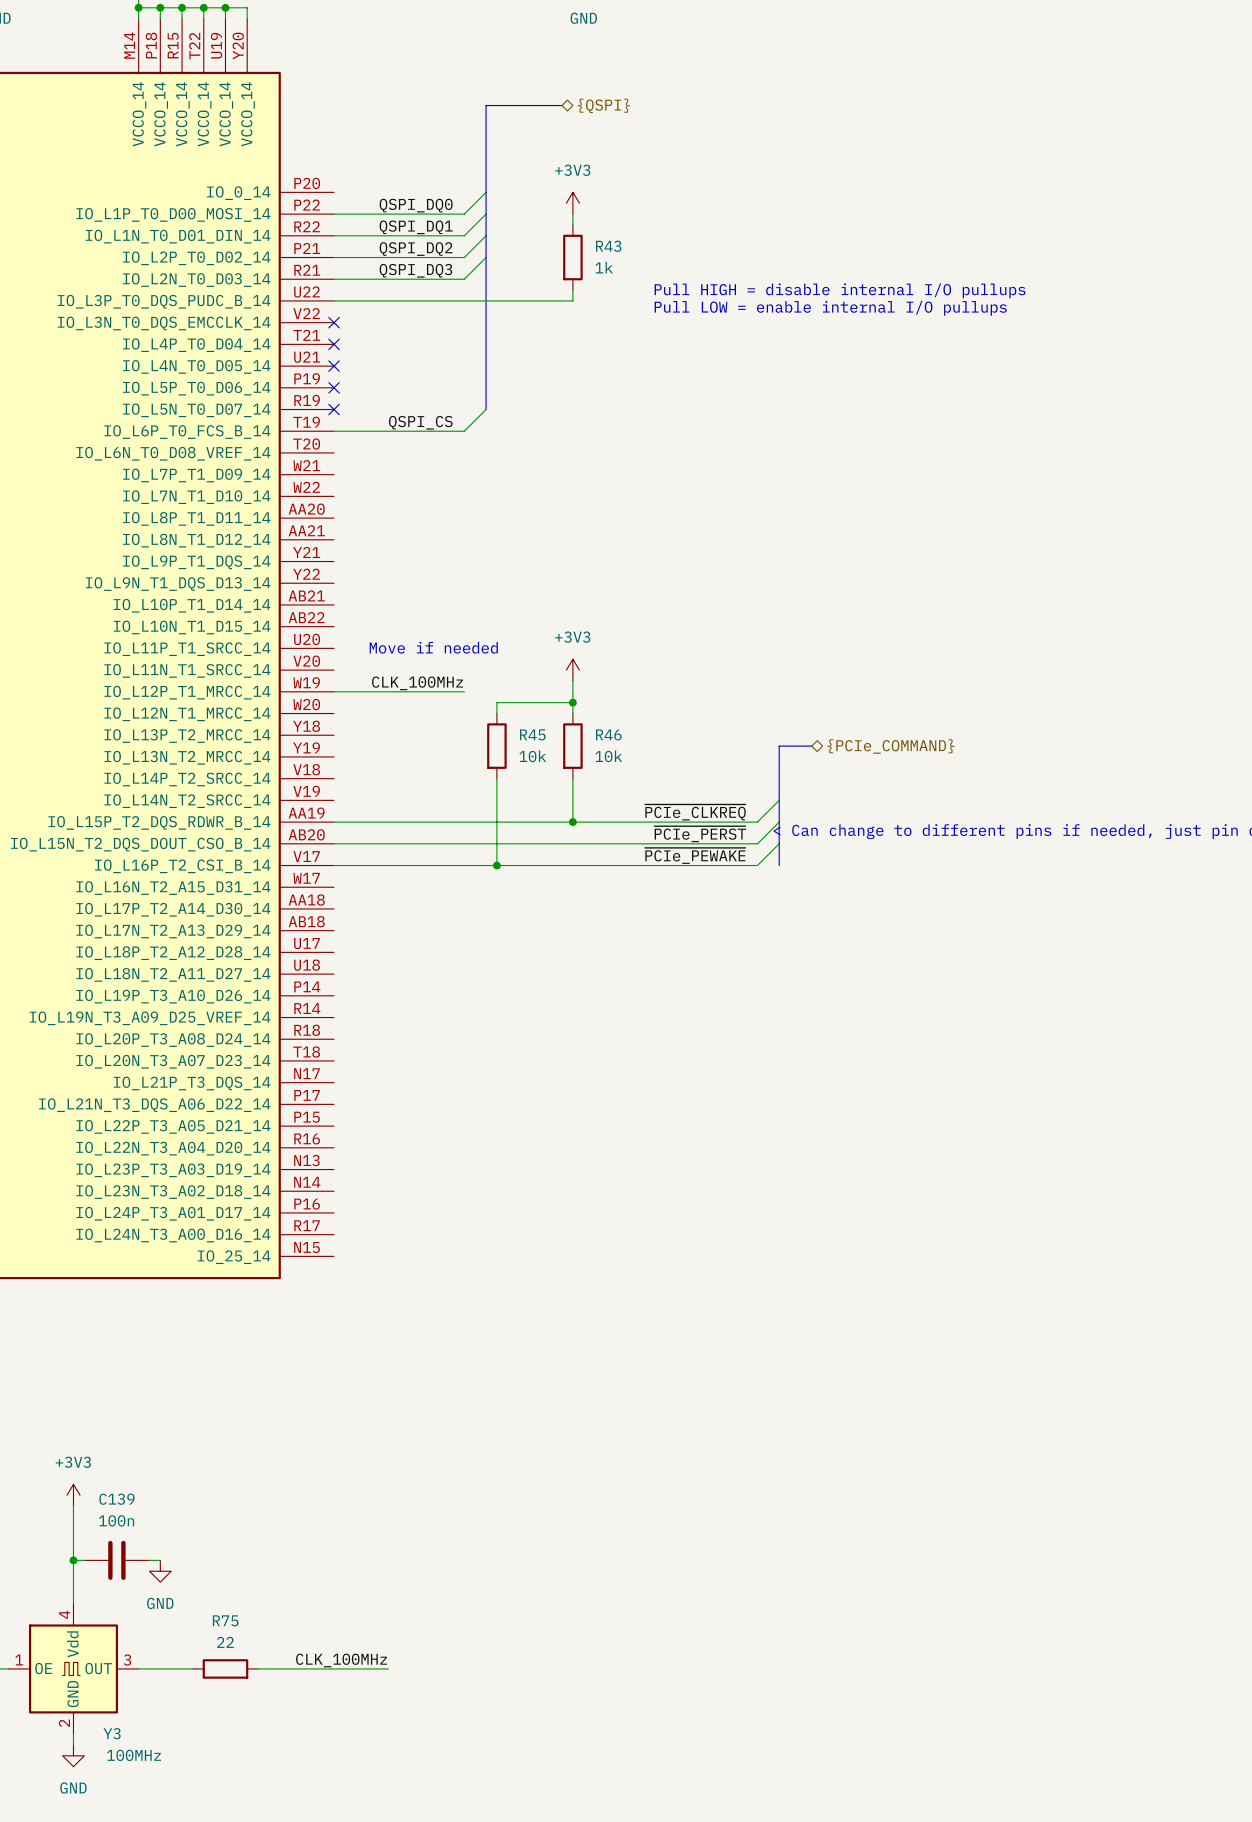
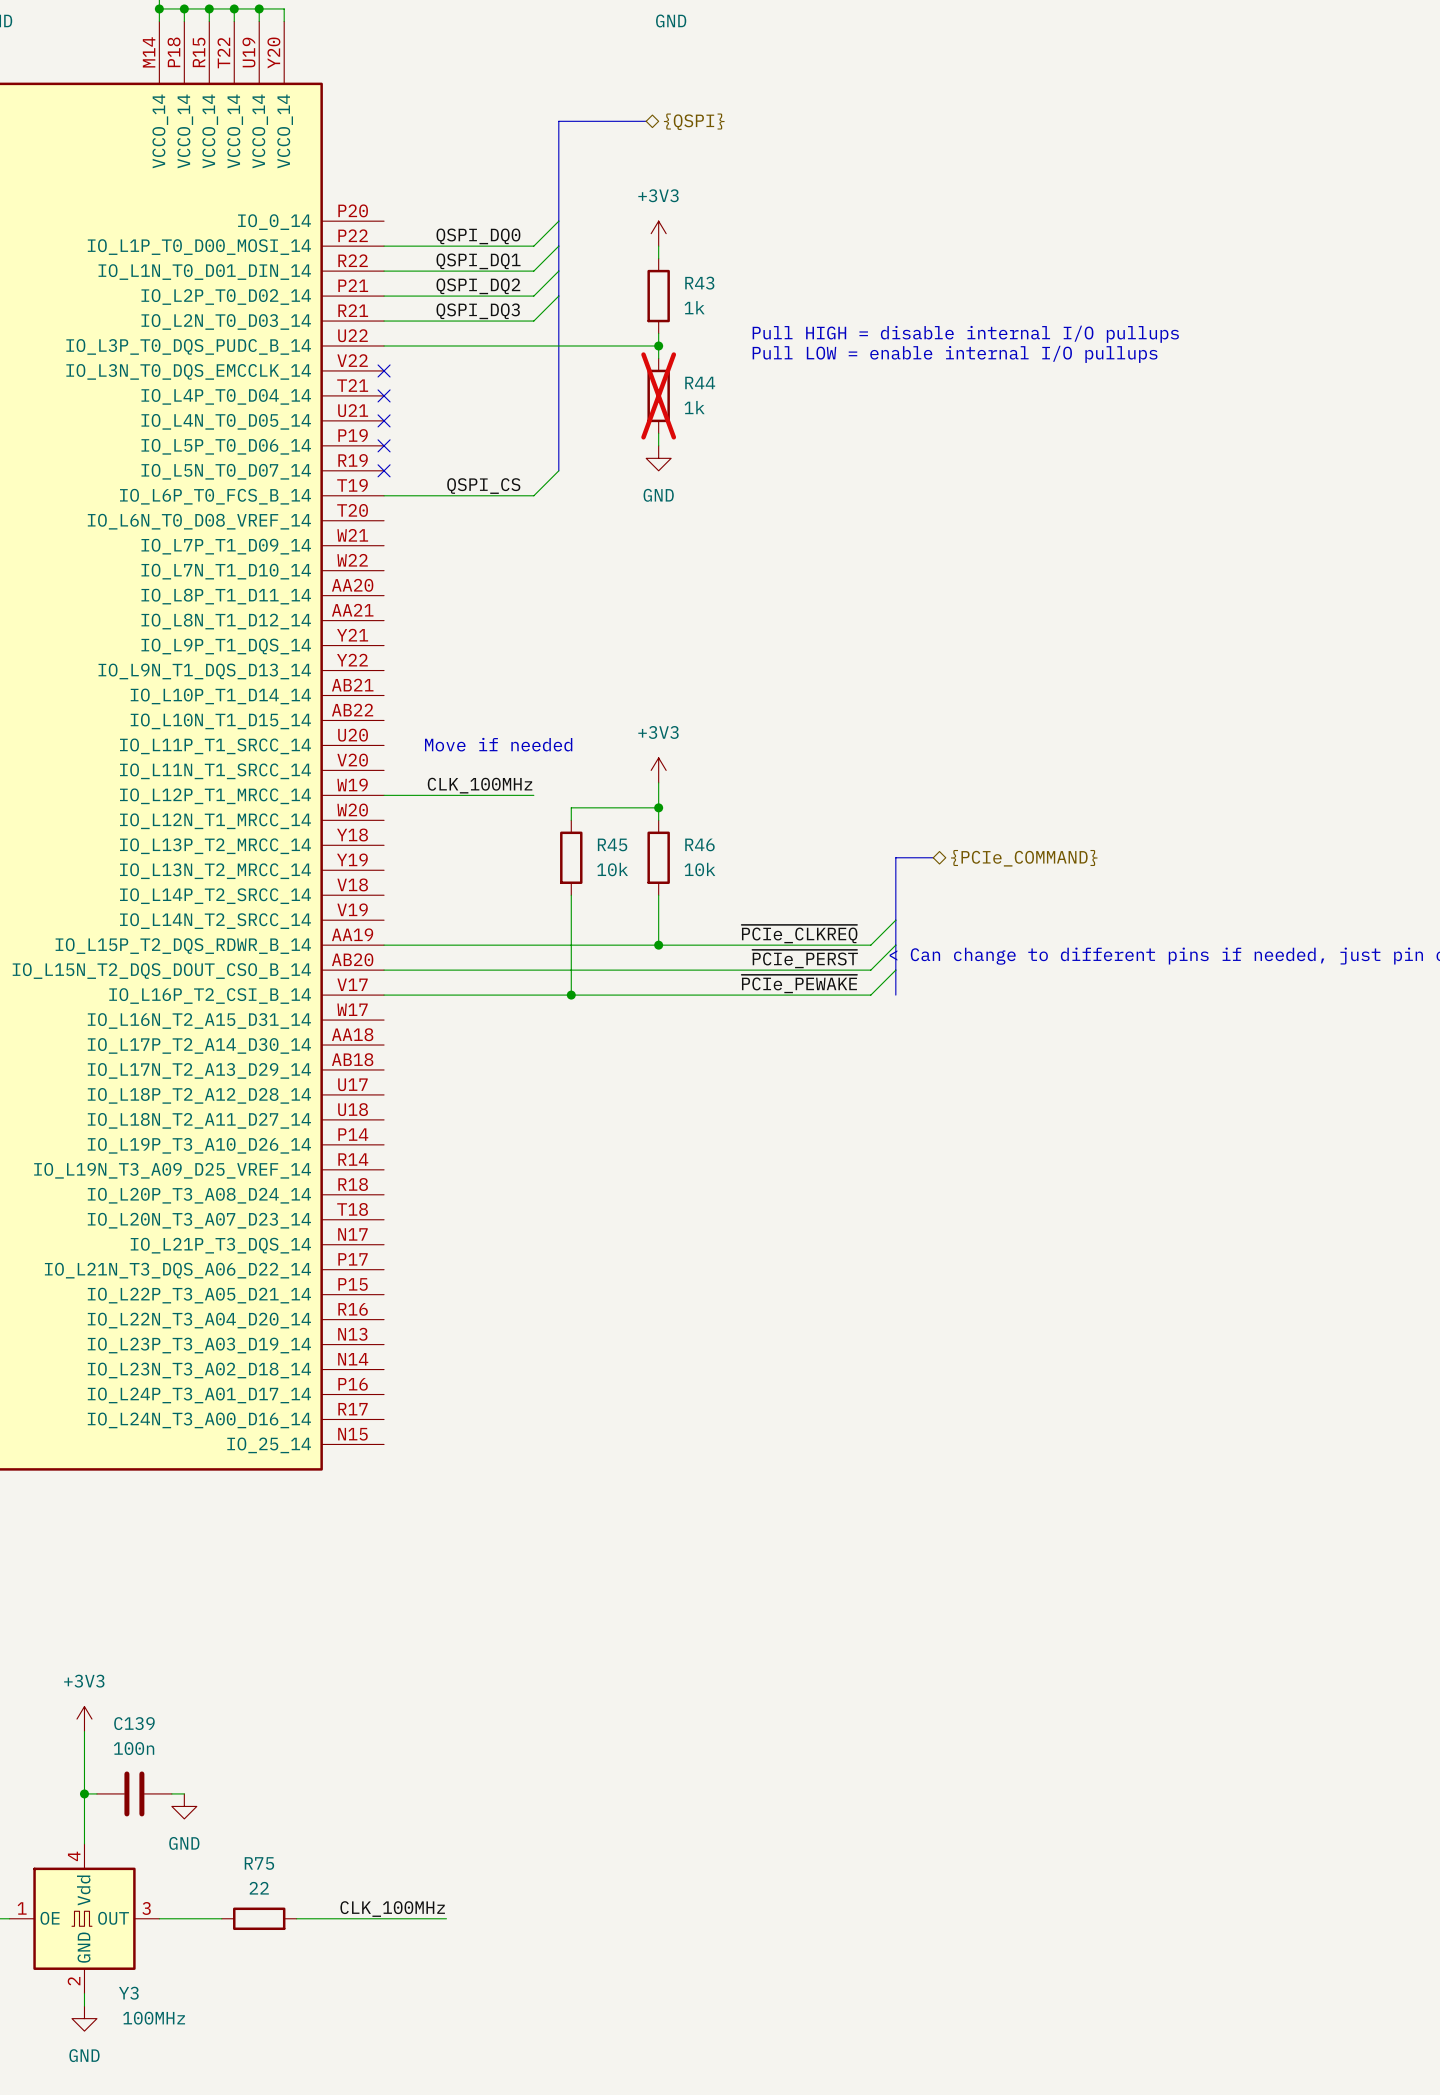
wire: none -> (658, 345) (658, 358)
junction: none -> (658, 345)
R44: none -> 1k (658, 395)
wire: none -> (658, 433) (658, 445)
power symbol: none -> GND (658, 458)

